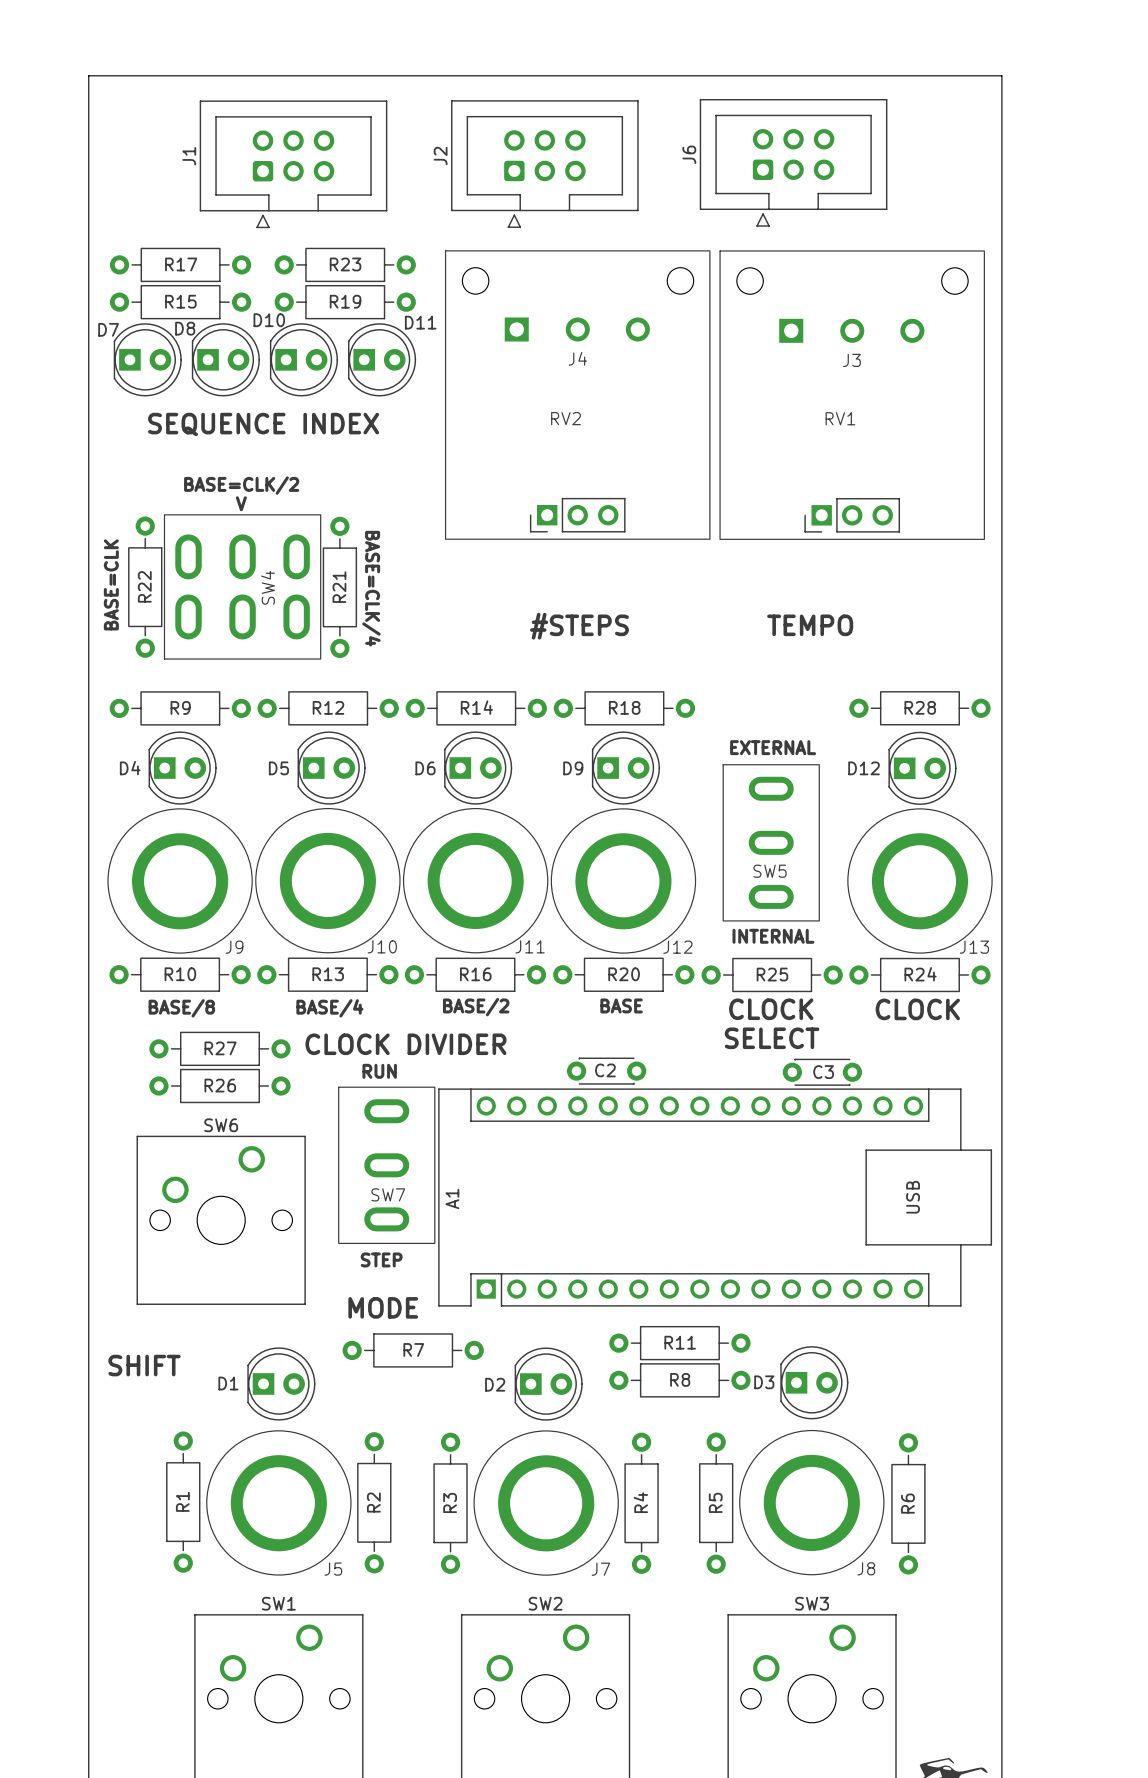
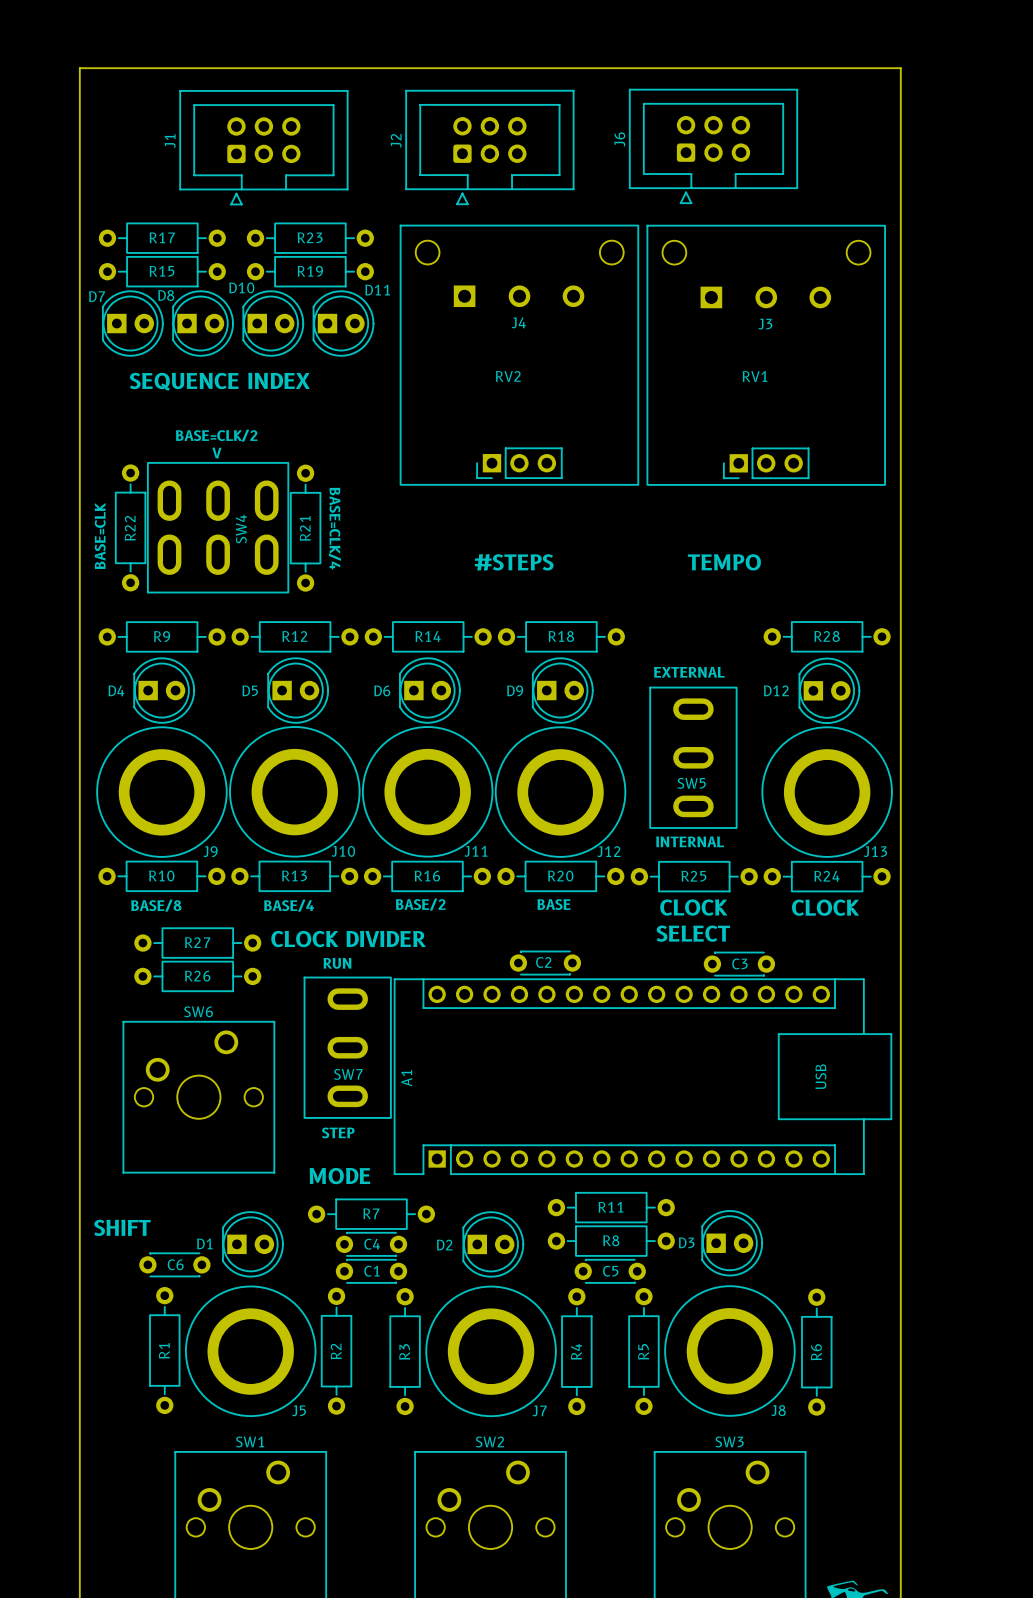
C4: none -> (371, 1244)
C6: none -> (174, 1264)
C1: none -> (371, 1271)
C5: none -> (610, 1271)

